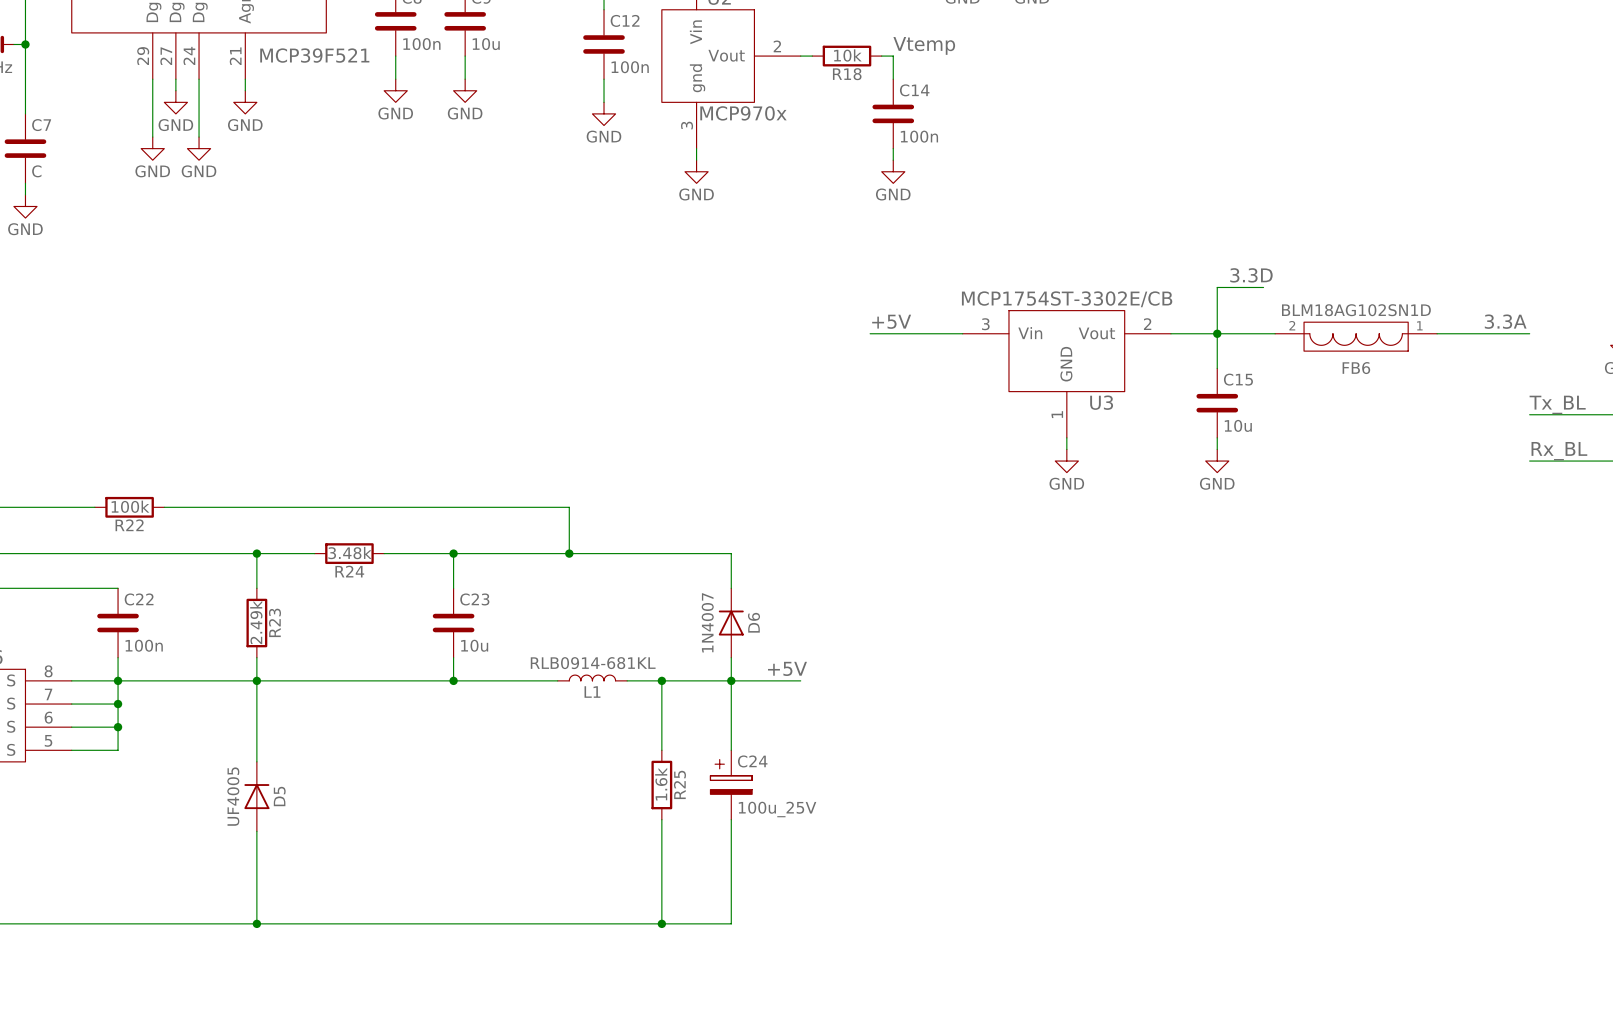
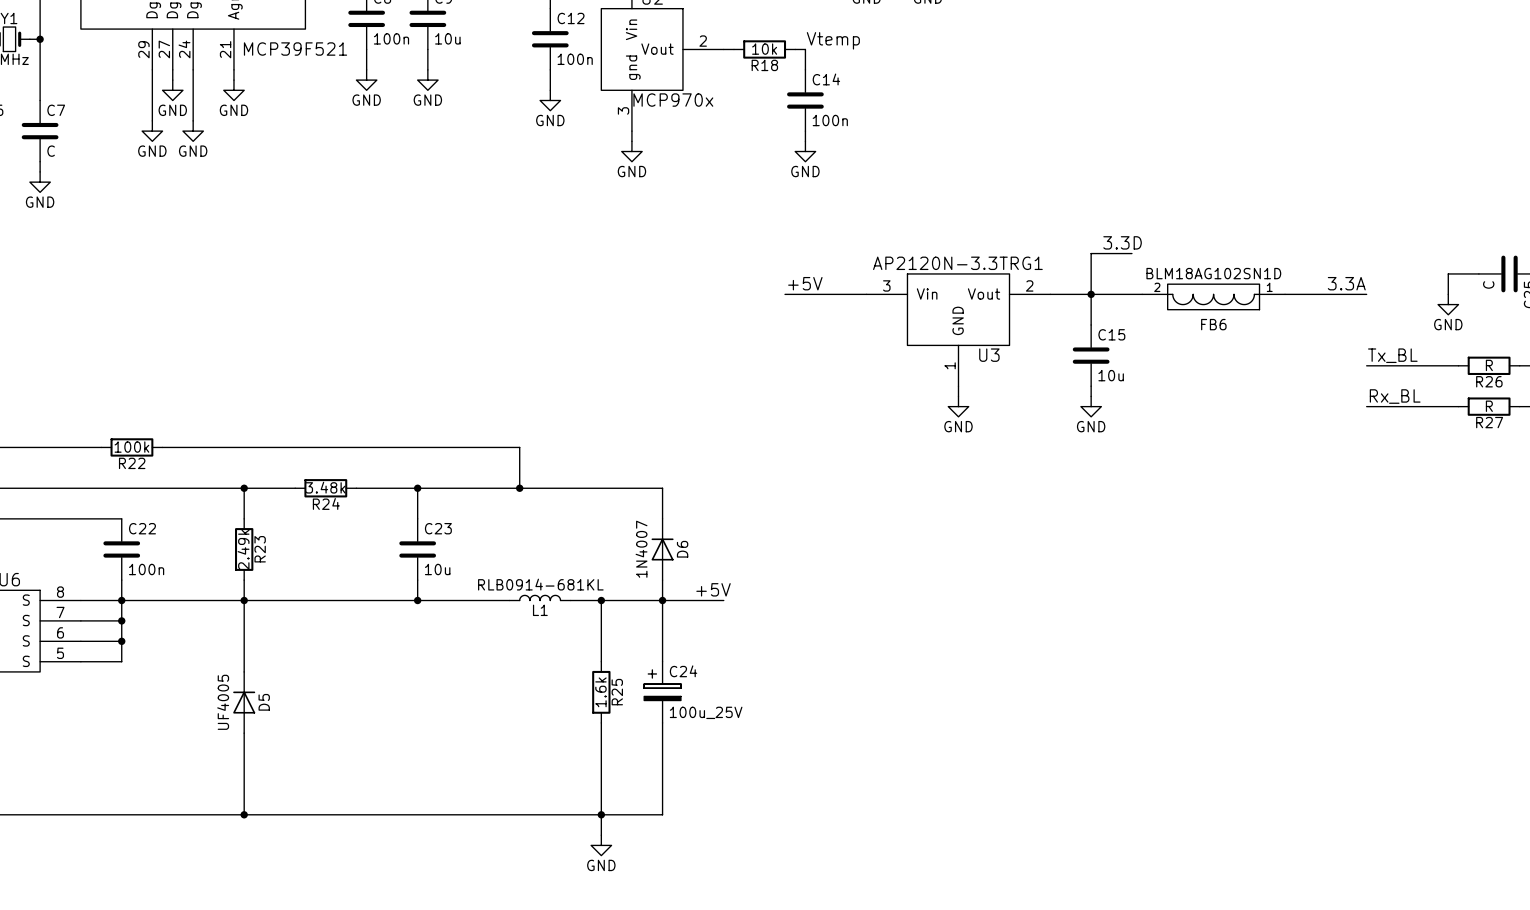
U3 value: MCP1754ST-3302E/CB (1067, 299) -> AP2120N-3.3TRG1 (957, 263)
wire: none -> (601, 814) (601, 835)
power symbol: none -> GND (601, 845)

